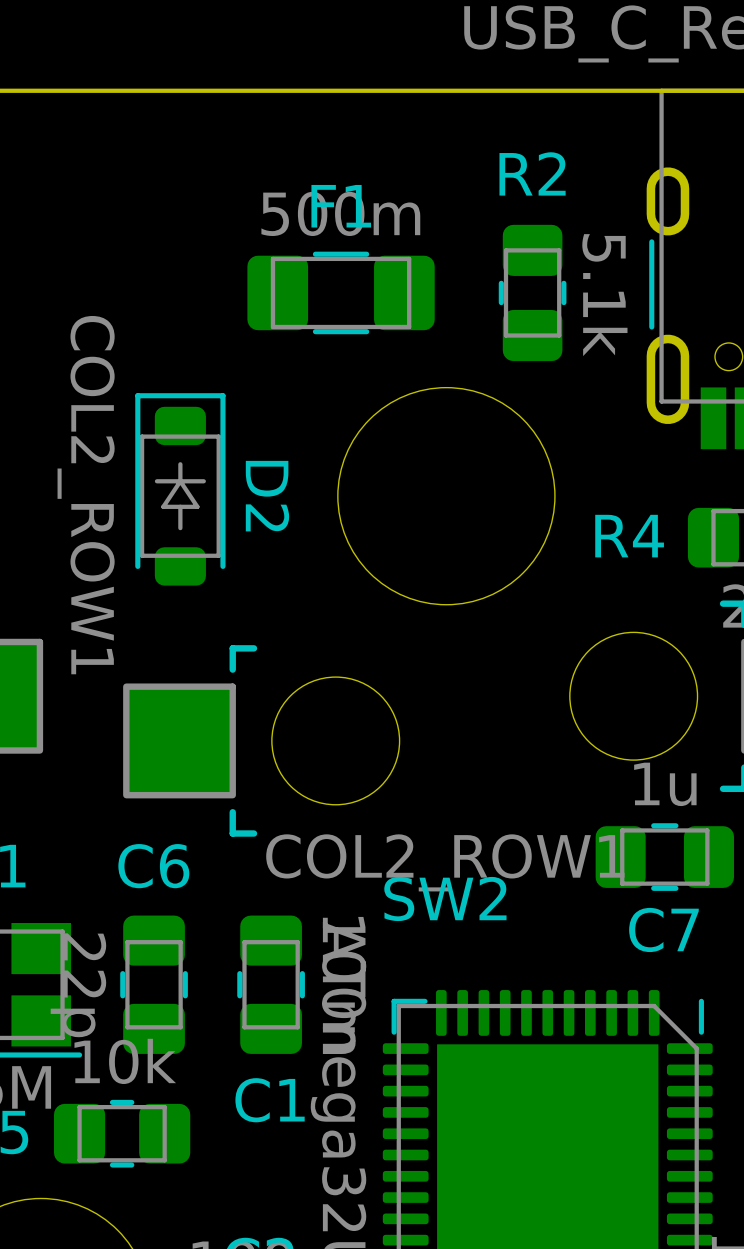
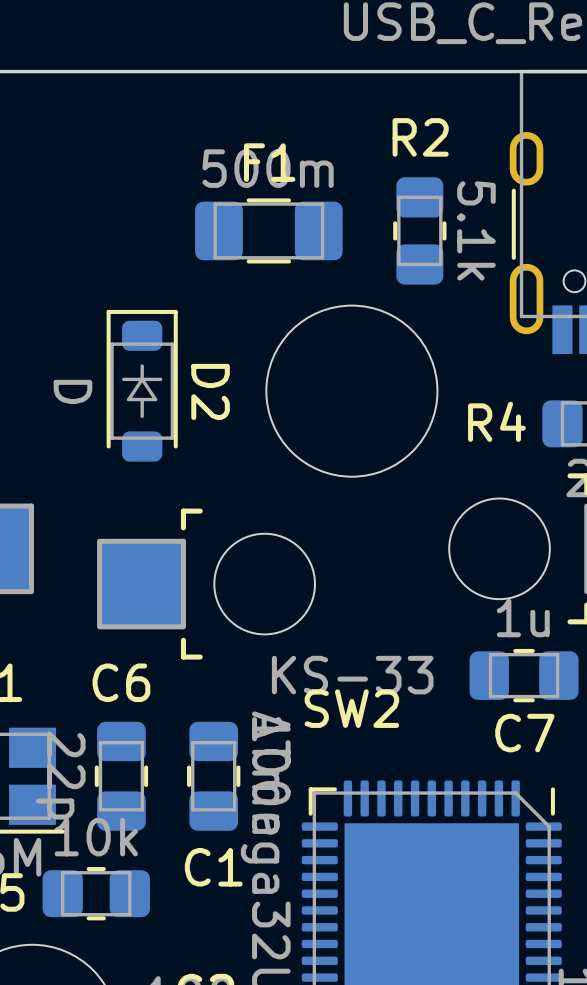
D2 value: COL2_ROW1 (86, 495) -> D (72, 391)
SW2 value: COL2_ROW1 (445, 862) -> KS-33 (352, 675)

